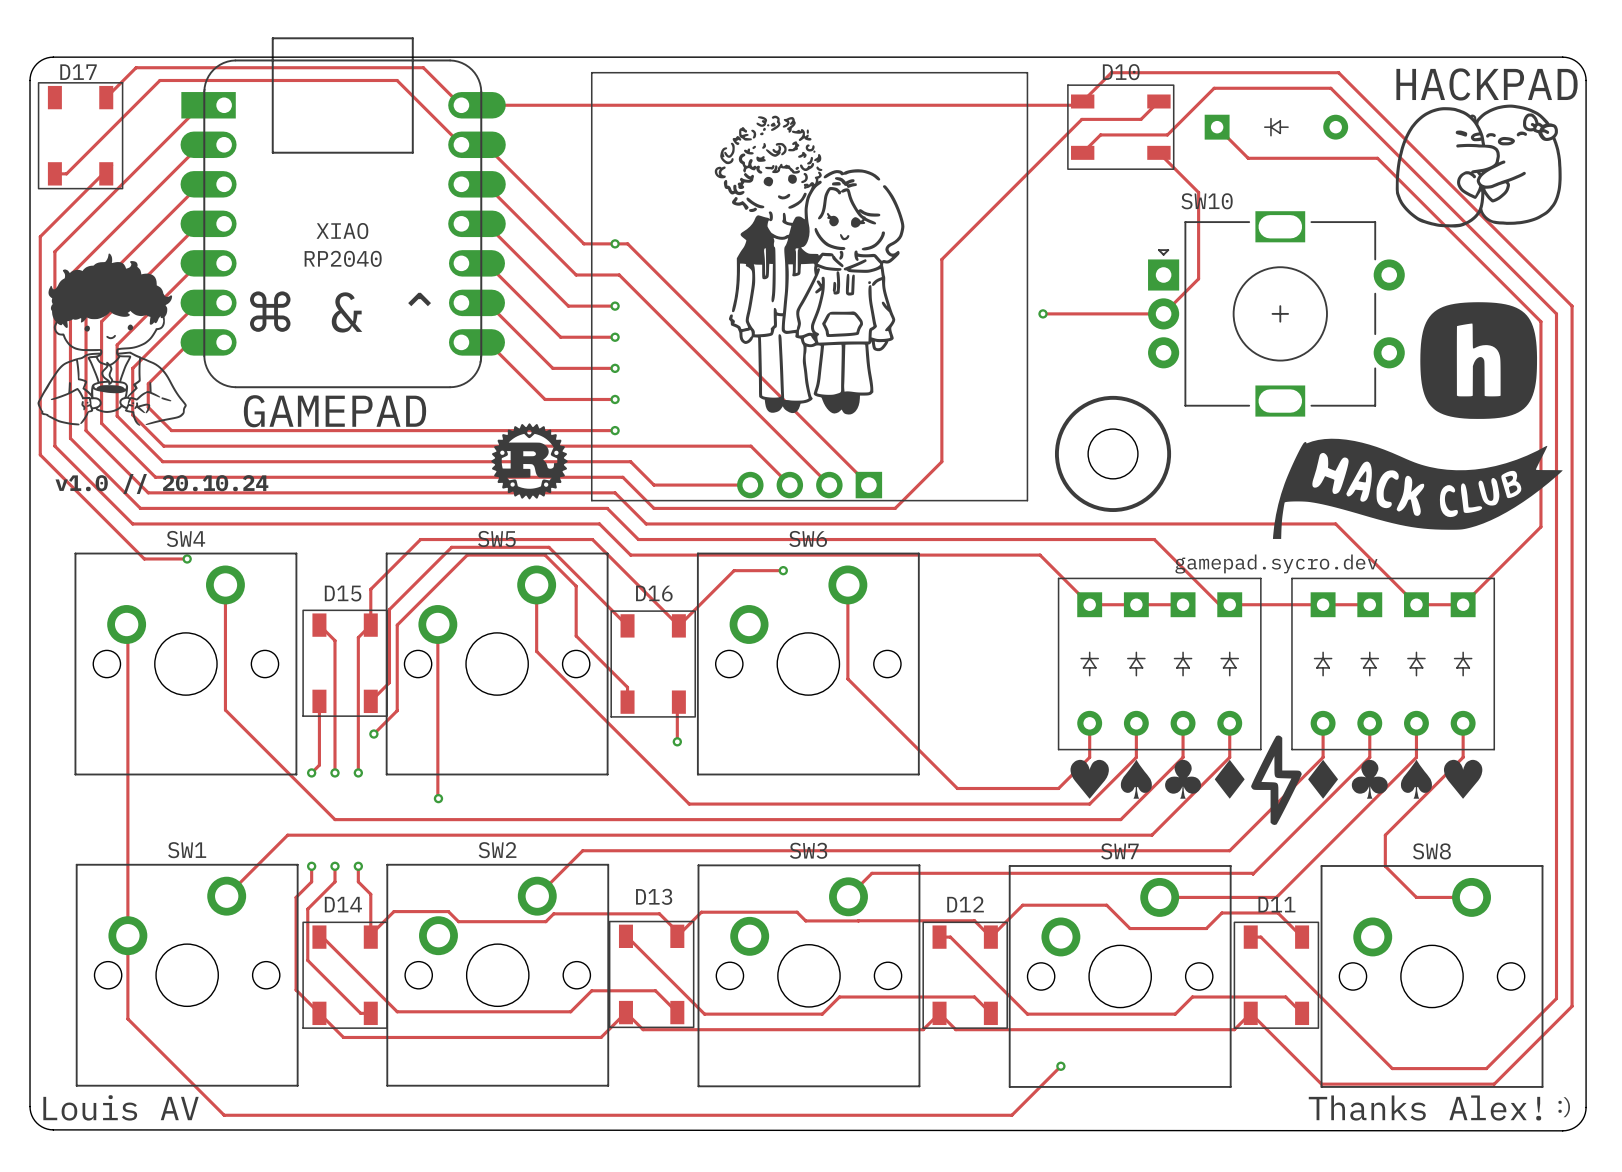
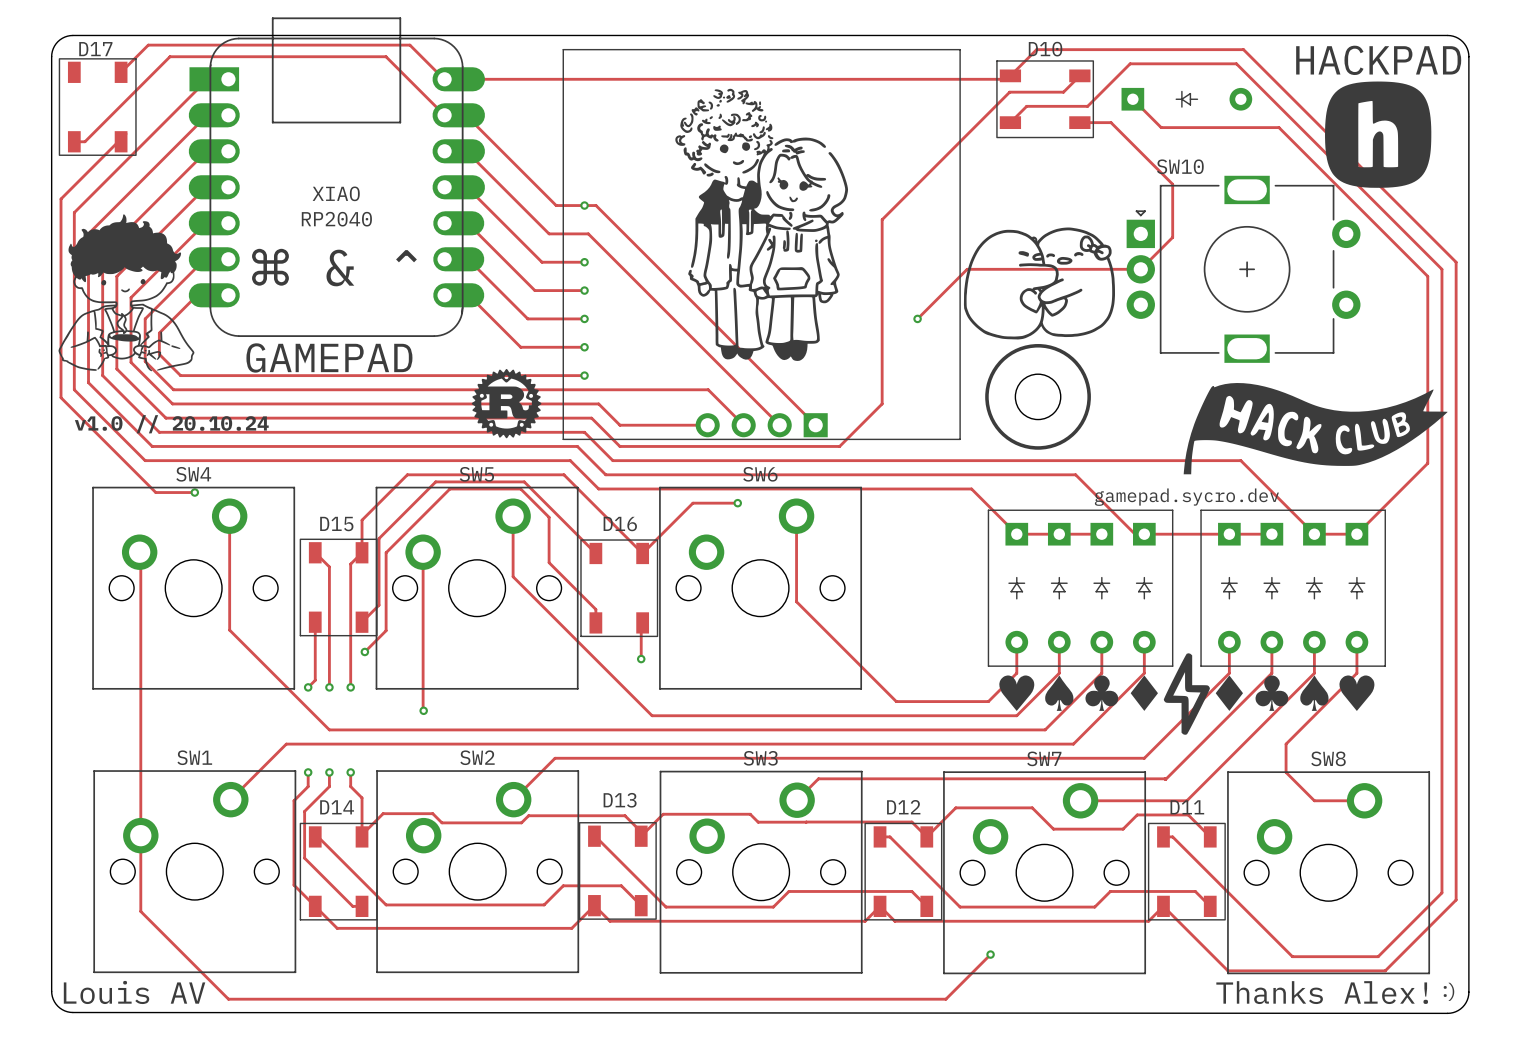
drawing: [1395, 104, 1562, 228] -> none
track: (1158, 152) (1198, 192) (1198, 278) (1163, 313) -> (1079, 122) (1111, 122) (1172, 184) (1172, 237) (1140, 269) (1084, 269)
drawing: none -> [963, 227, 1116, 340]
track: none -> (974, 269) (967, 269) (917, 318)
via position: (1043, 313) -> (917, 318)
SW10 position: (1276, 313) -> (1243, 269)
drawing position: (1478, 360) -> (1378, 134)

